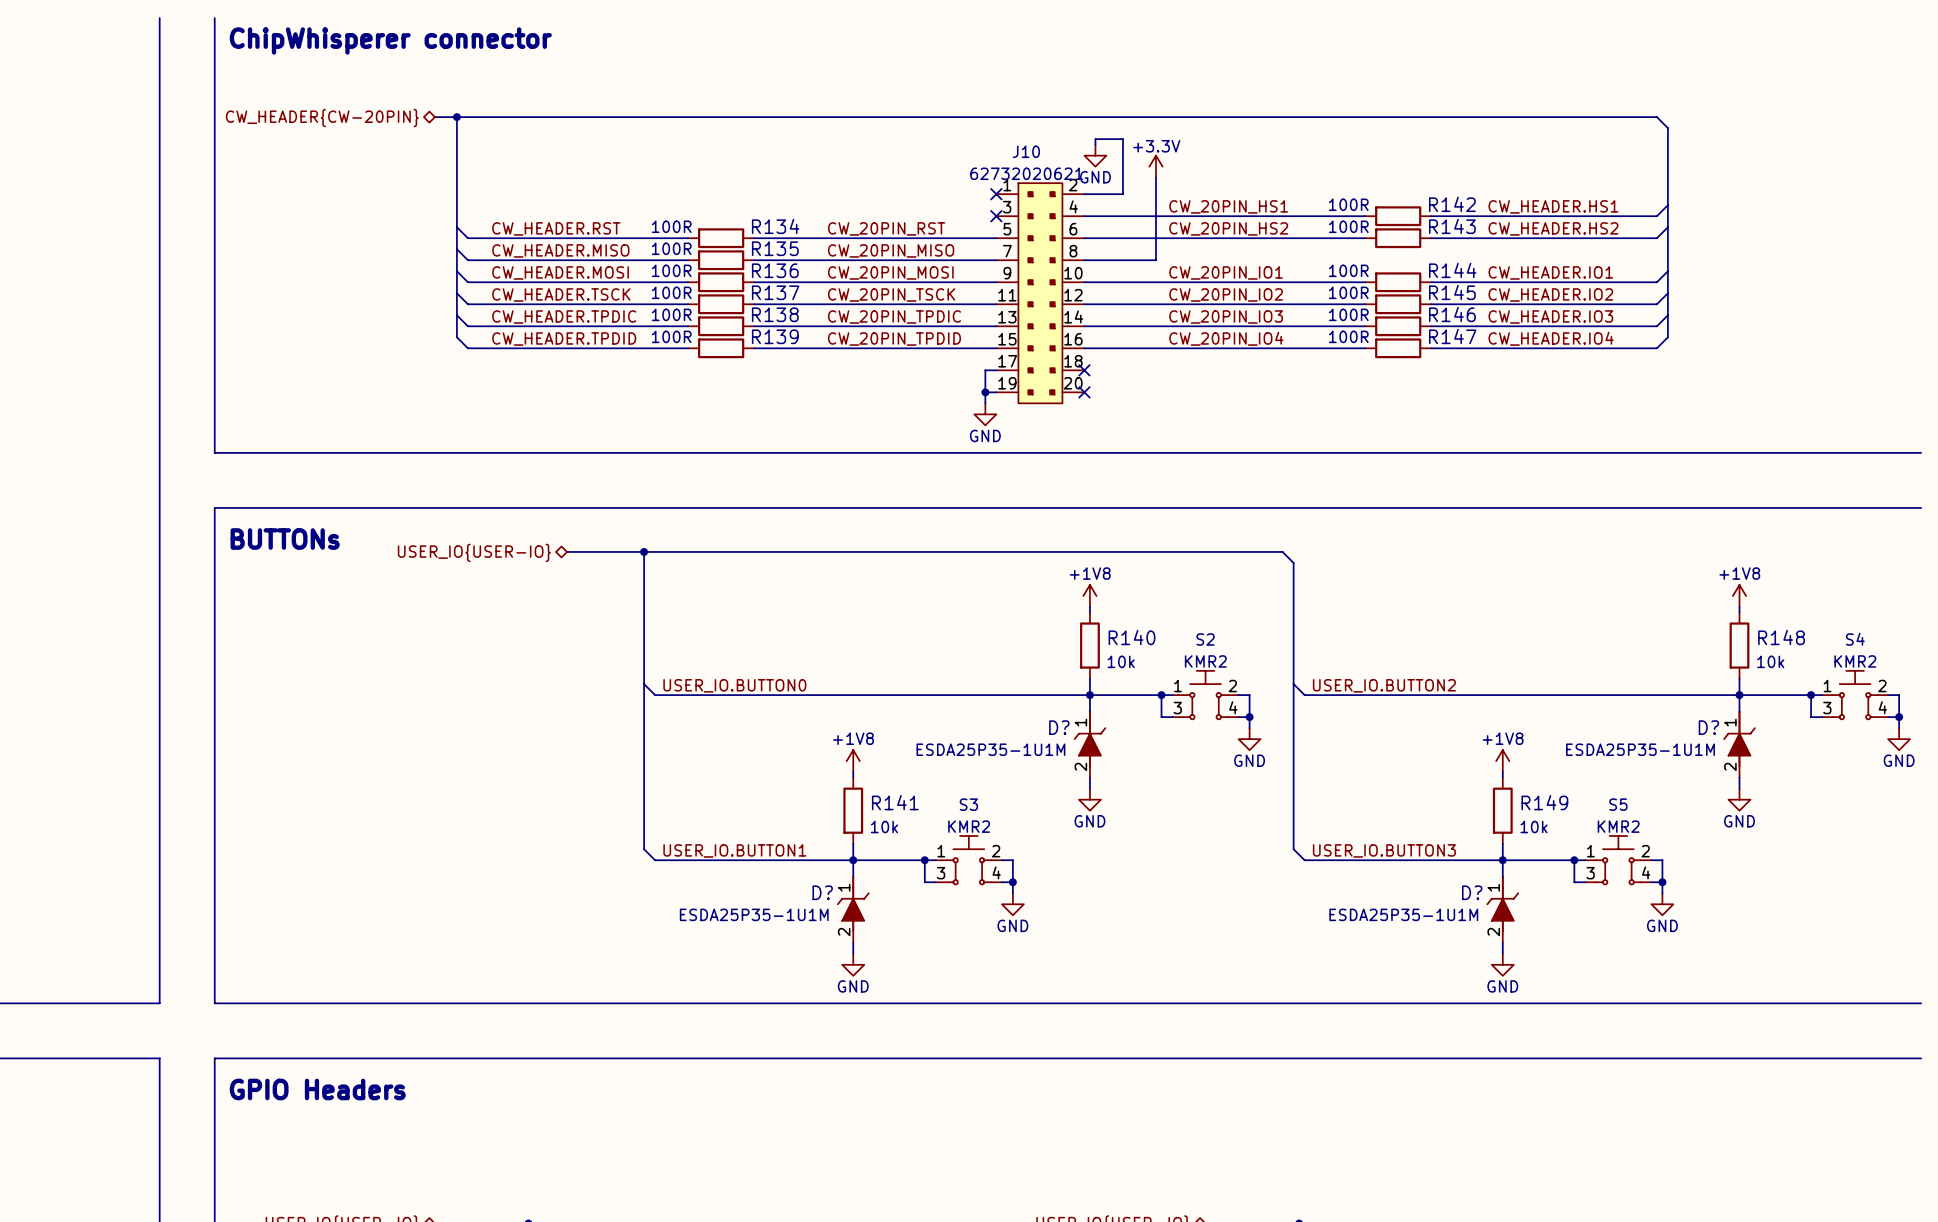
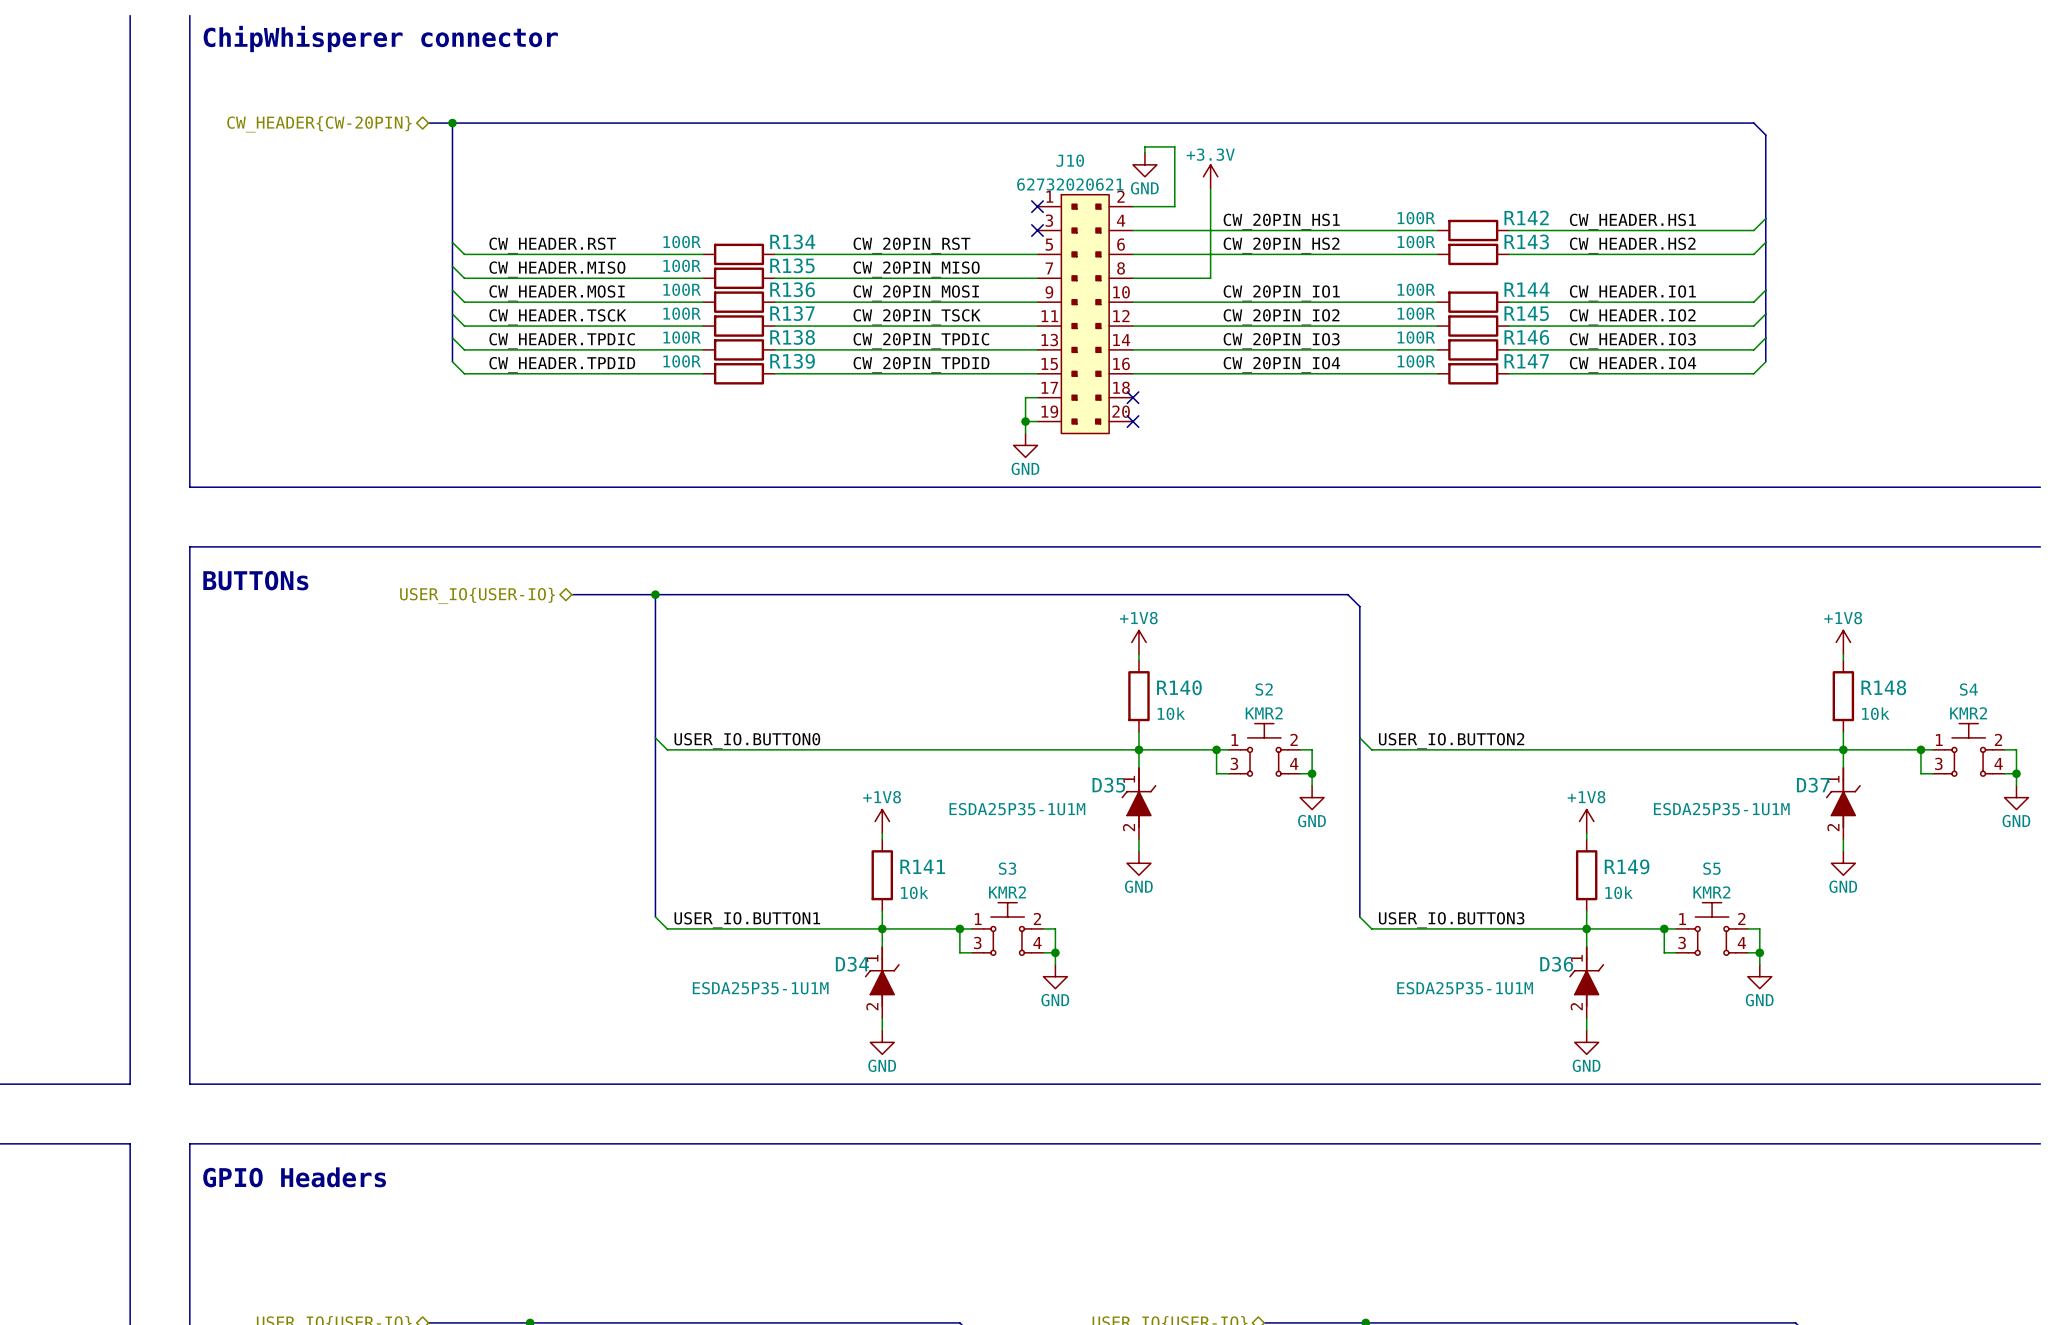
D? name: D? (1059, 727) -> D35 (1108, 785)
D? name: D? (1708, 727) -> D37 (1813, 785)
D? name: D? (822, 892) -> D34 (852, 964)
D? name: D? (1472, 892) -> D36 (1556, 964)

